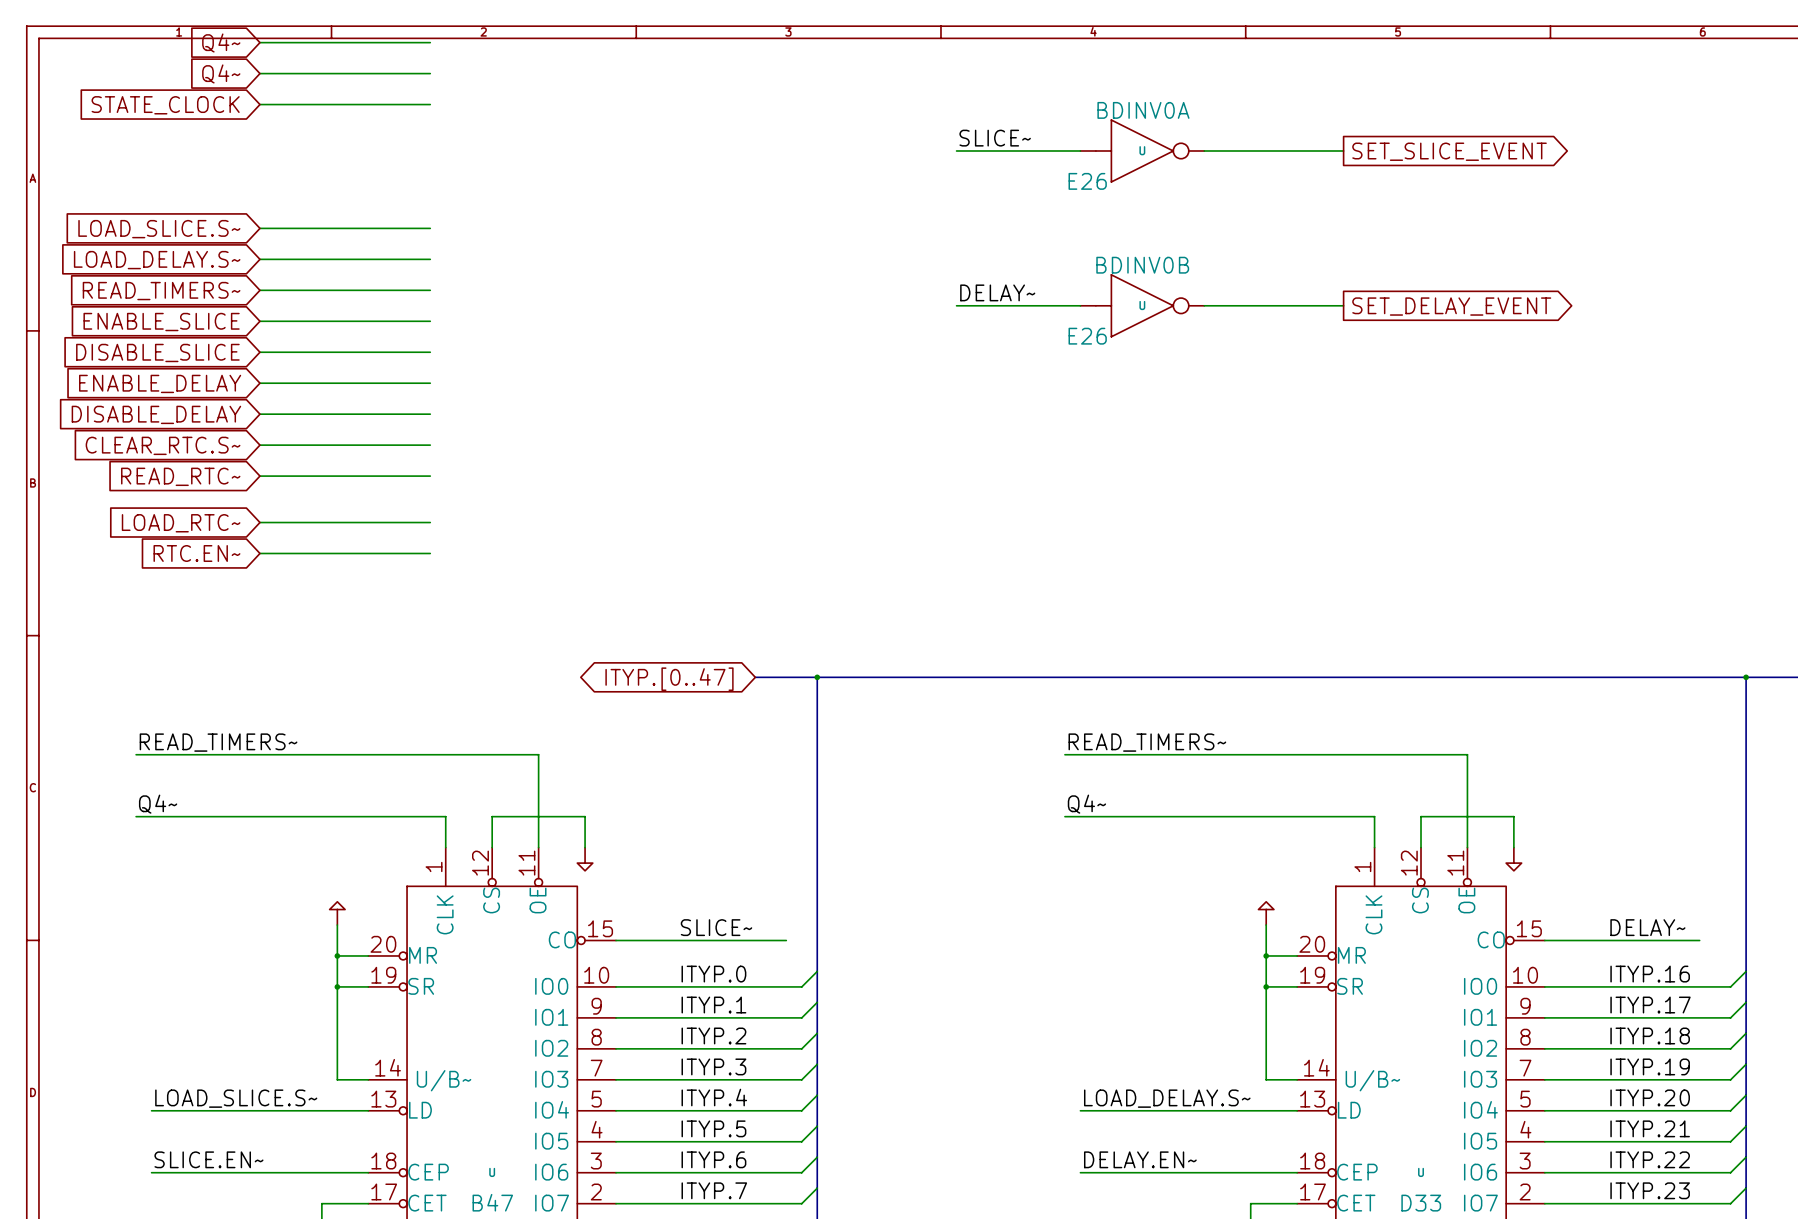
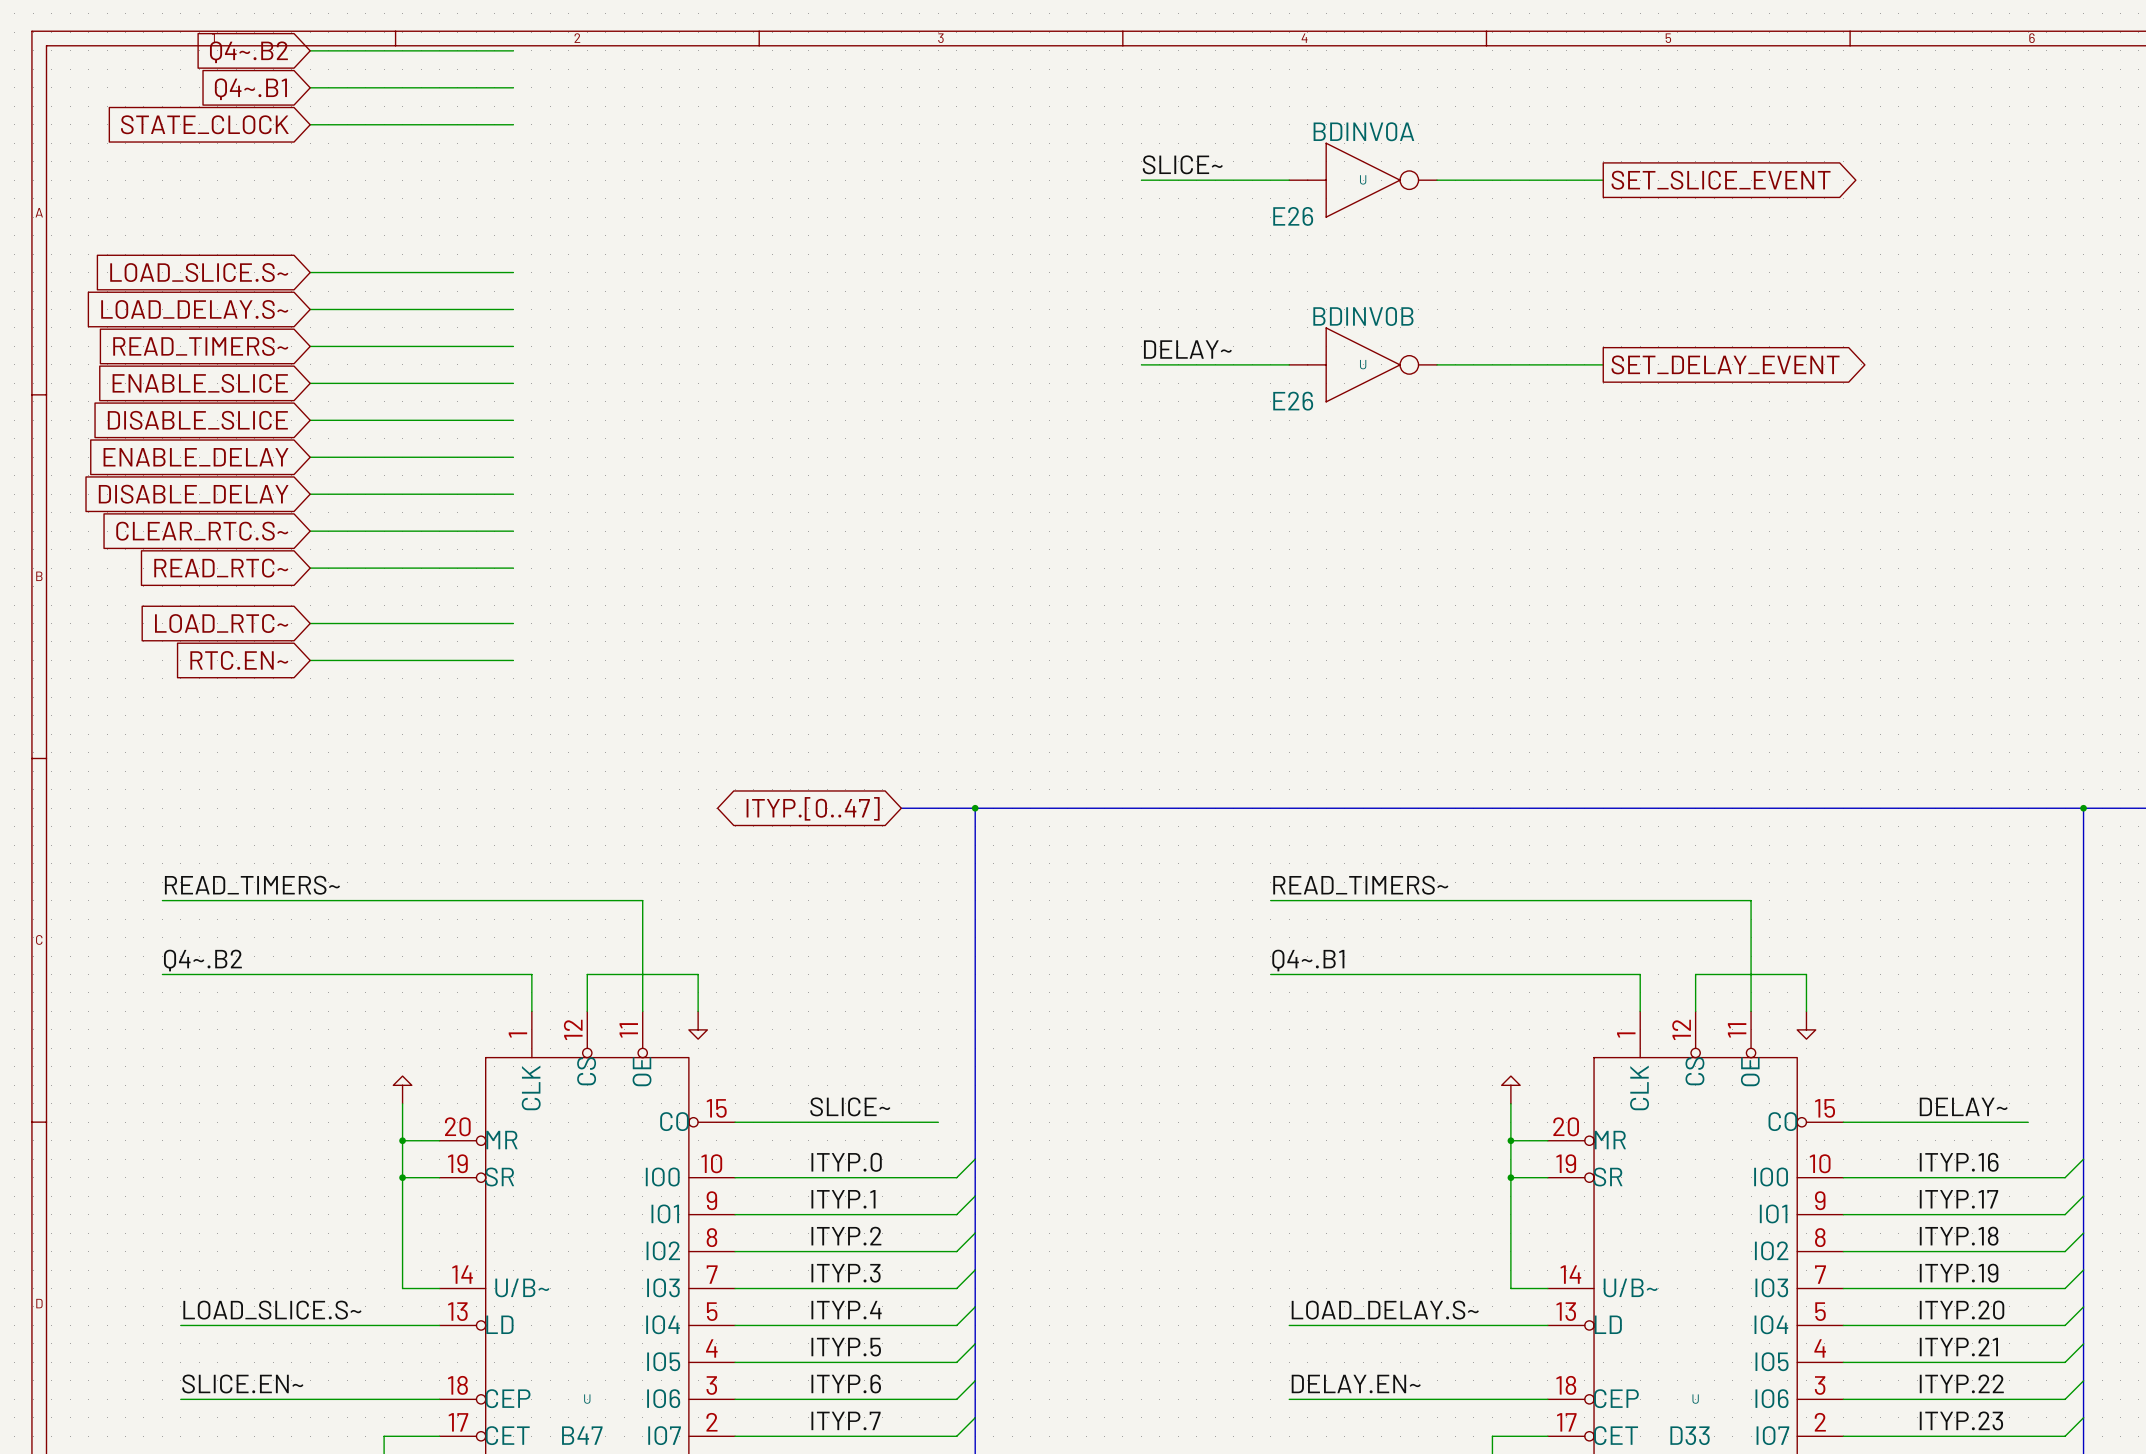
global label: Q4~ (221, 43) -> Q4~.B2 (248, 52)
global label: Q4~ (221, 73) -> Q4~.B1 (250, 89)
label: Q4~ (158, 804) -> Q4~.B2 (202, 960)
label: Q4~ (1086, 804) -> Q4~.B1 (1308, 960)

